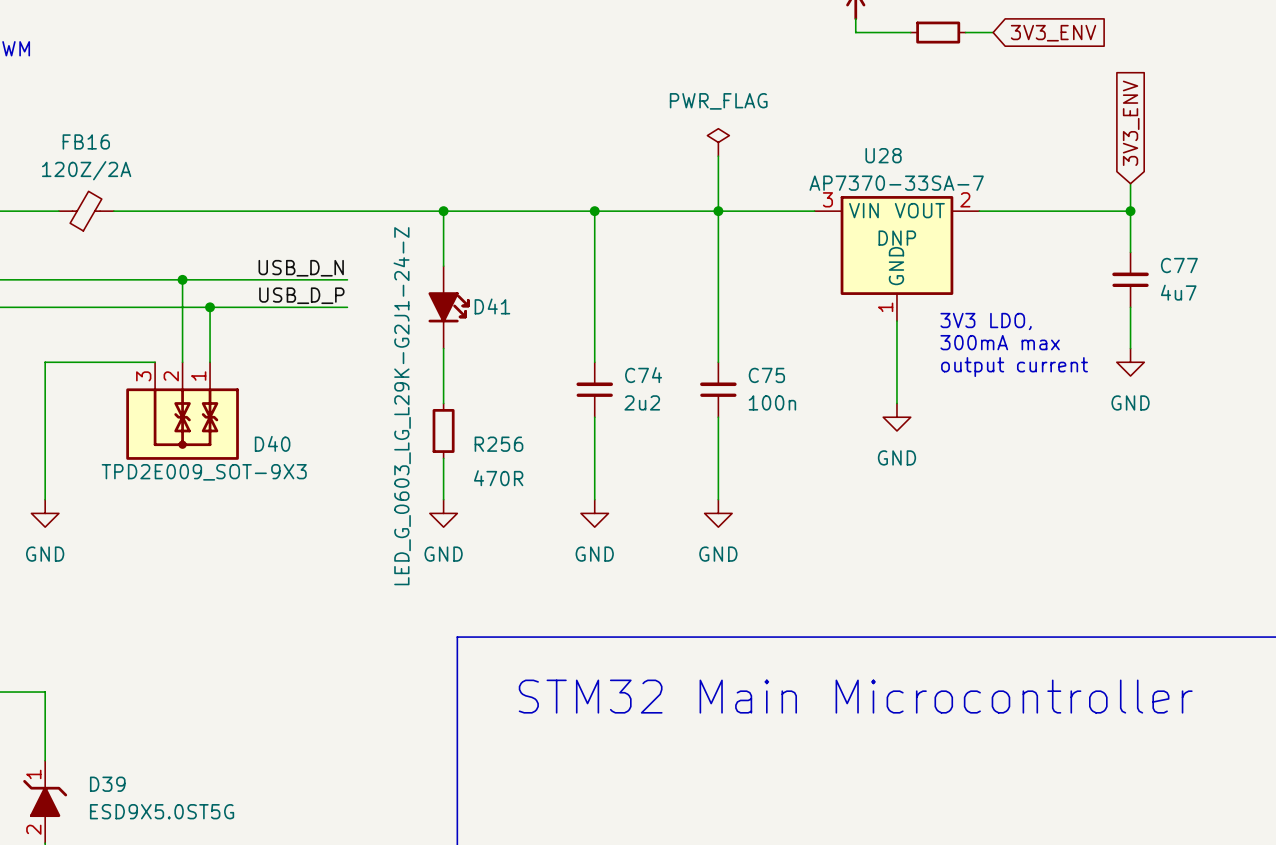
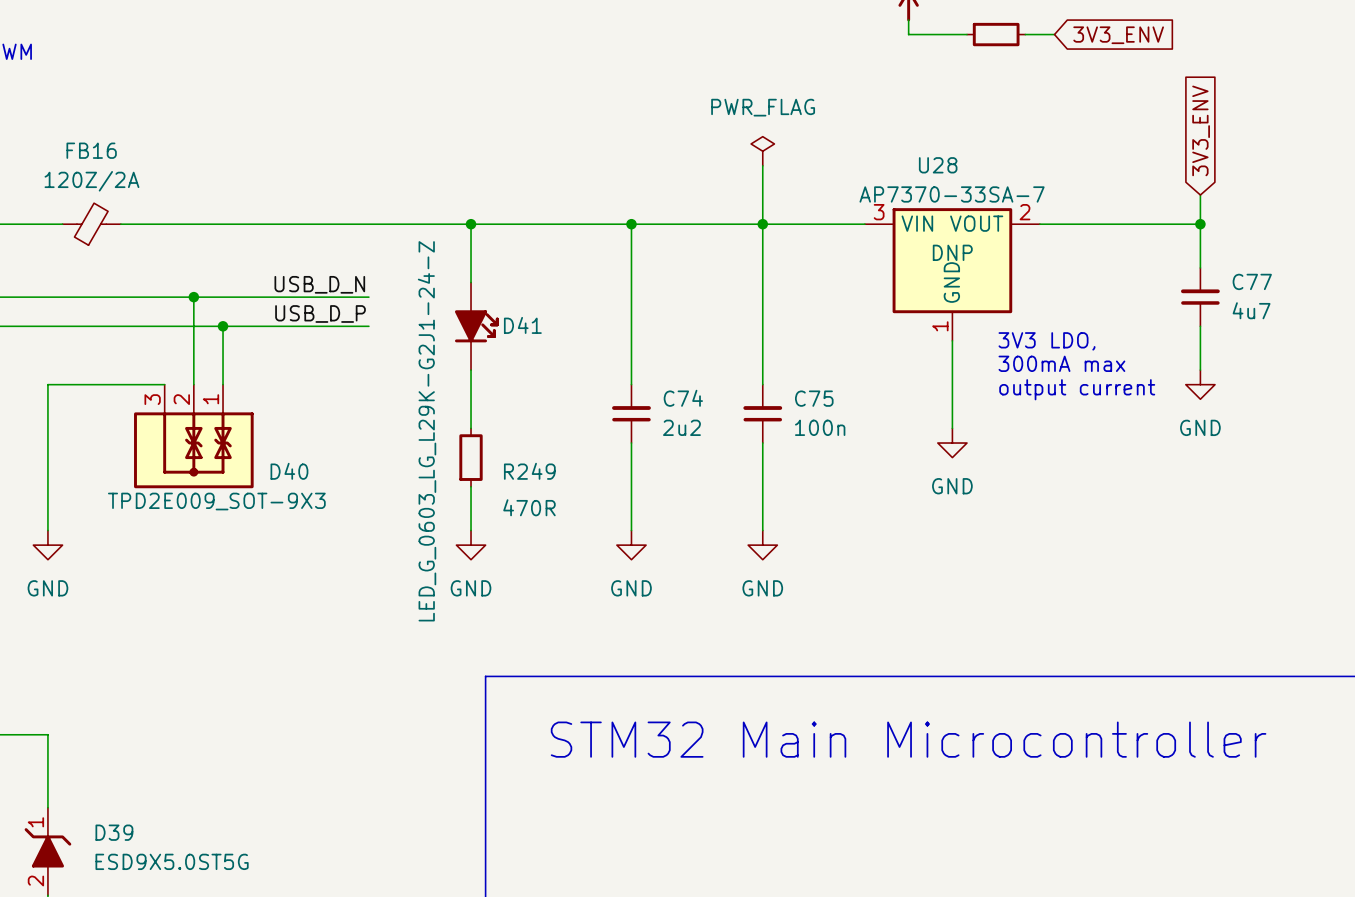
R256 name: R256 (498, 444) -> R249 (529, 471)

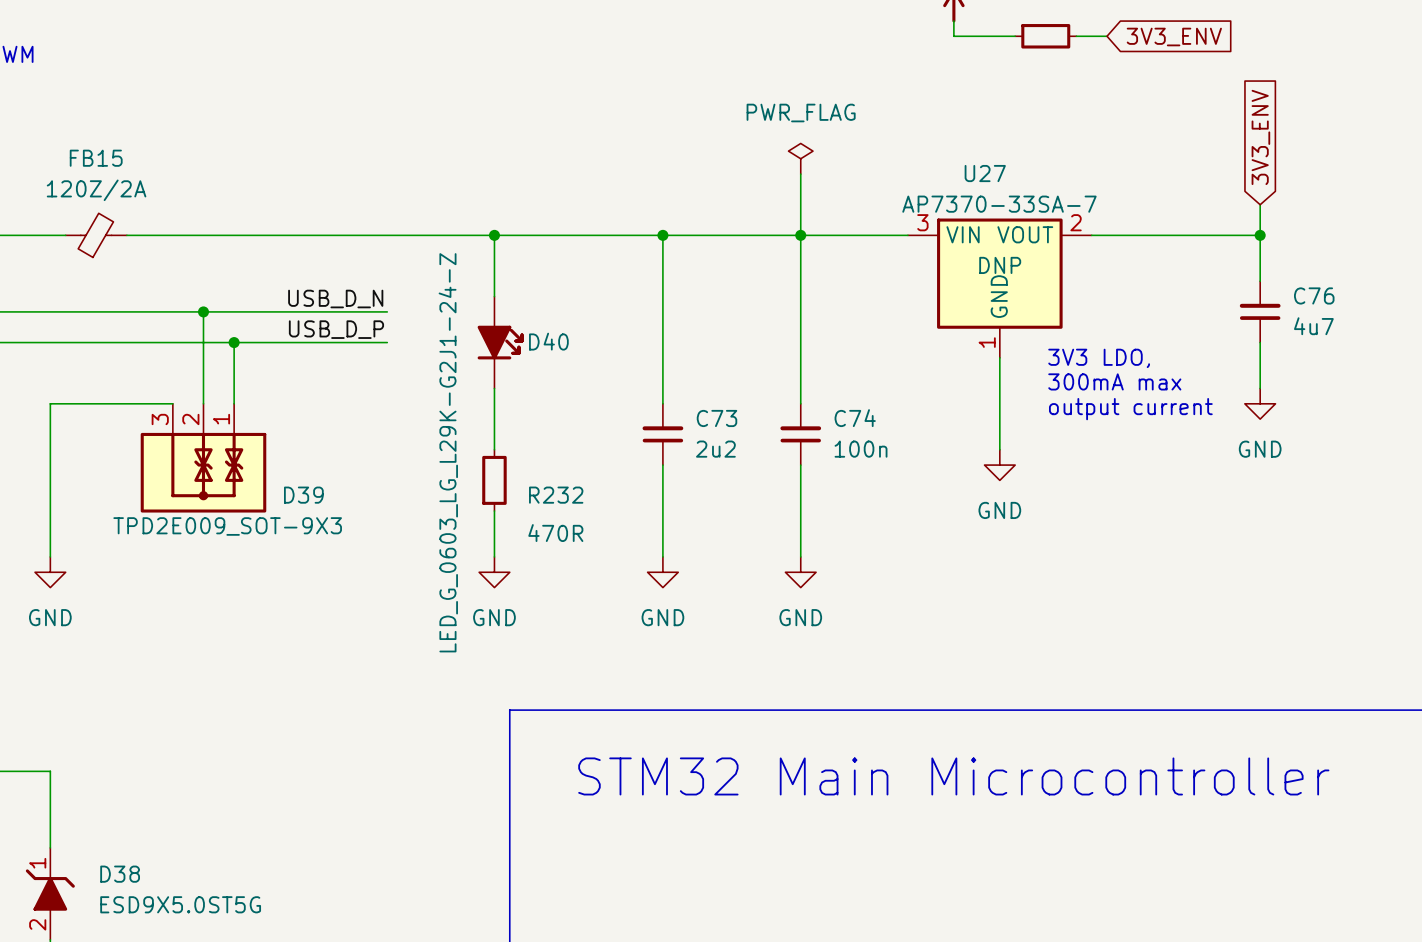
FB16 name: FB16 (91, 150) -> FB15 (96, 158)
U28 name: U28 (938, 165) -> U27 (985, 173)
C77 name: C77 (1252, 281) -> C76 (1314, 295)
D41 name: D41 (522, 325) -> D40 (548, 341)
C74 name: C74 (683, 398) -> C73 (717, 418)
C75 name: C75 (814, 398) -> C74 (855, 418)
D40 name: D40 (289, 471) -> D39 (303, 495)
R249 name: R249 (529, 471) -> R232 (556, 495)
D39 name: D39 (114, 832) -> D38 (120, 874)

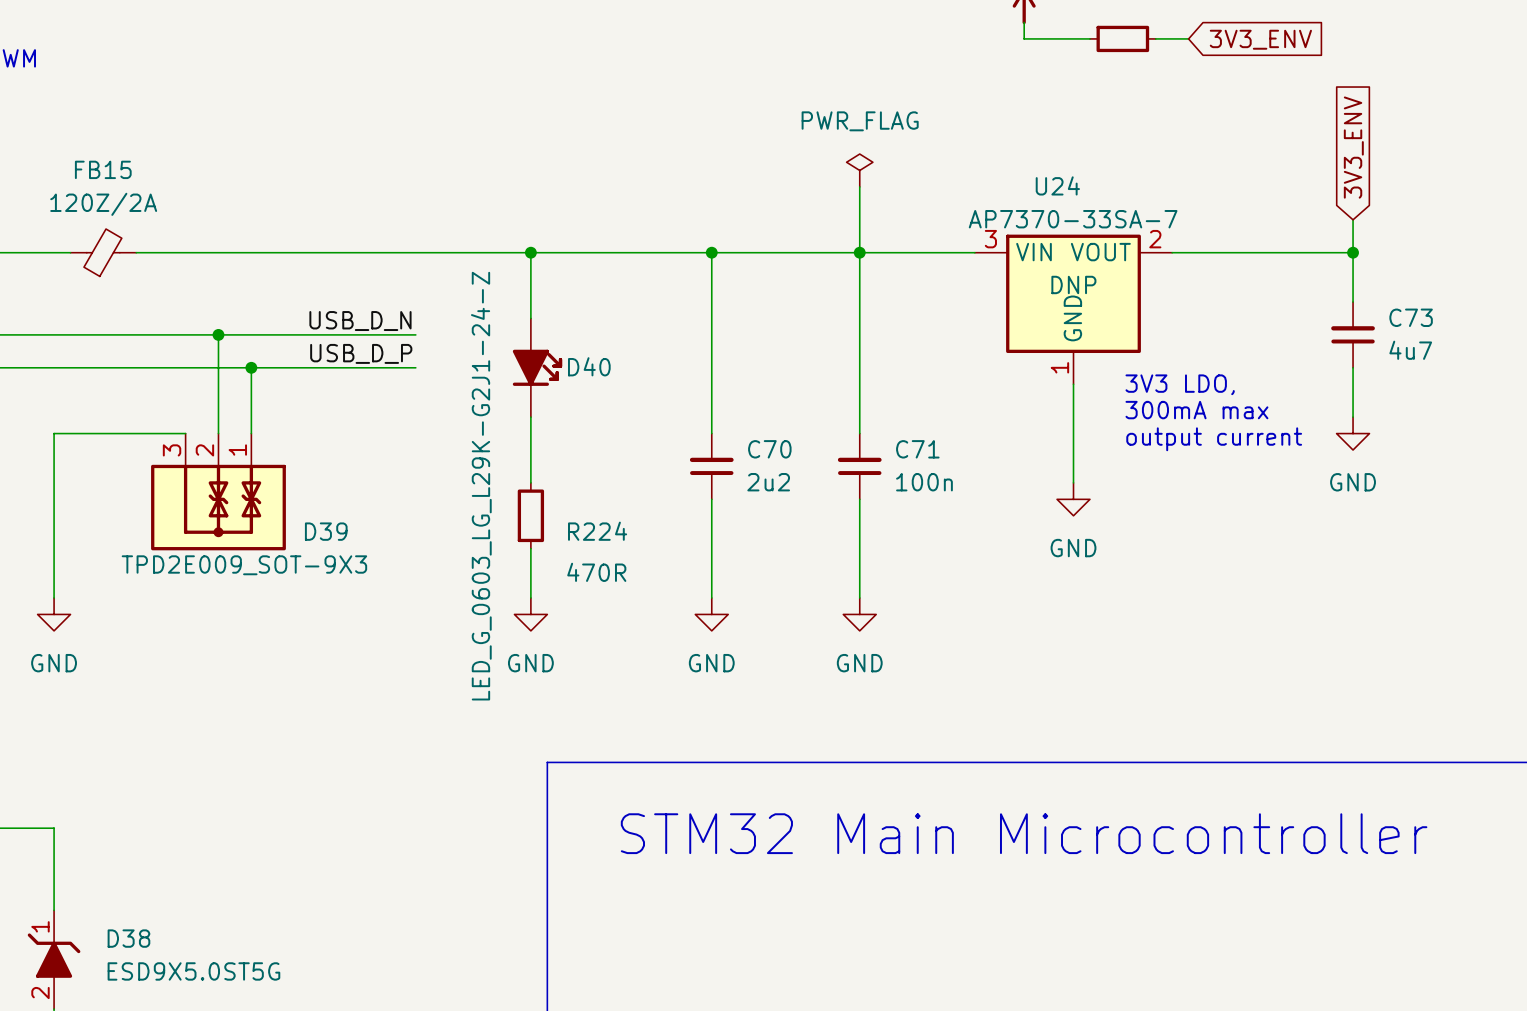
U27 name: U27 (985, 173) -> U24 (1057, 185)
C76 name: C76 (1314, 295) -> C73 (1411, 317)
C73 name: C73 (717, 418) -> C70 (769, 449)
C74 name: C74 (855, 418) -> C71 (917, 449)
R232 name: R232 (556, 495) -> R224 (597, 531)

